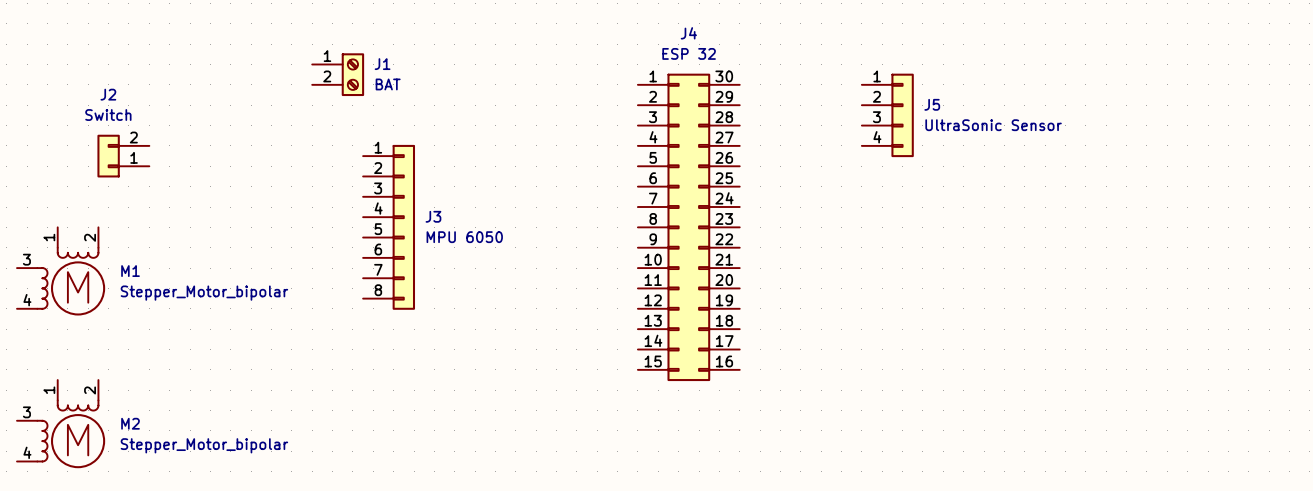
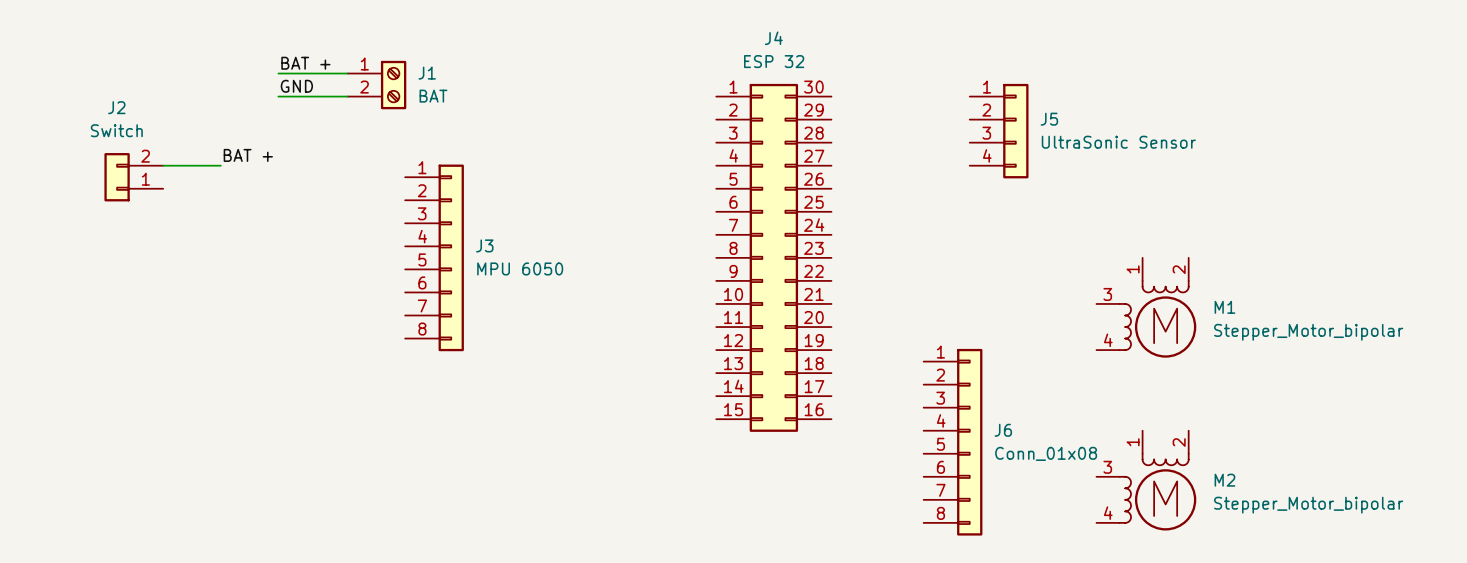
label: none -> BAT + (305, 63)
wire: none -> (278, 73) (347, 73)
label: none -> GND (296, 86)
wire: none -> (278, 96) (347, 96)
label: none -> BAT + (248, 155)
wire: none -> (163, 165) (220, 165)
M1 position: (61, 271) -> (1146, 307)
J6: none -> Conn_01x08 (953, 442)
M2 position: (61, 424) -> (1146, 480)

